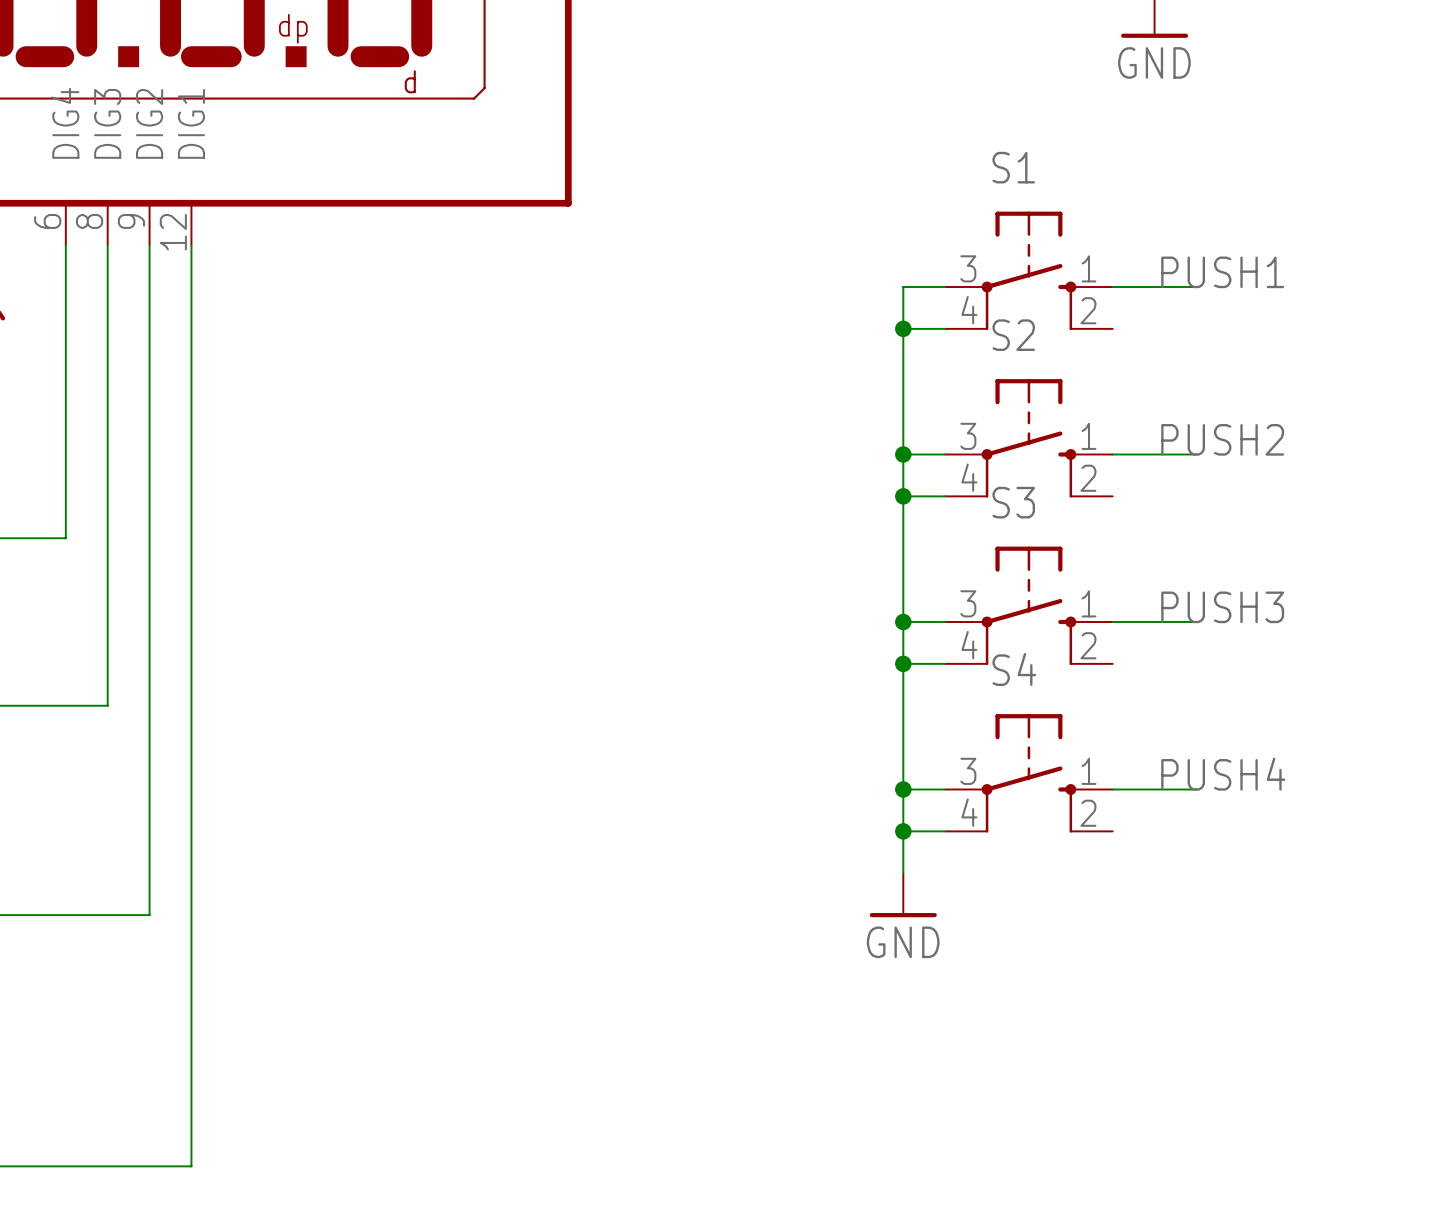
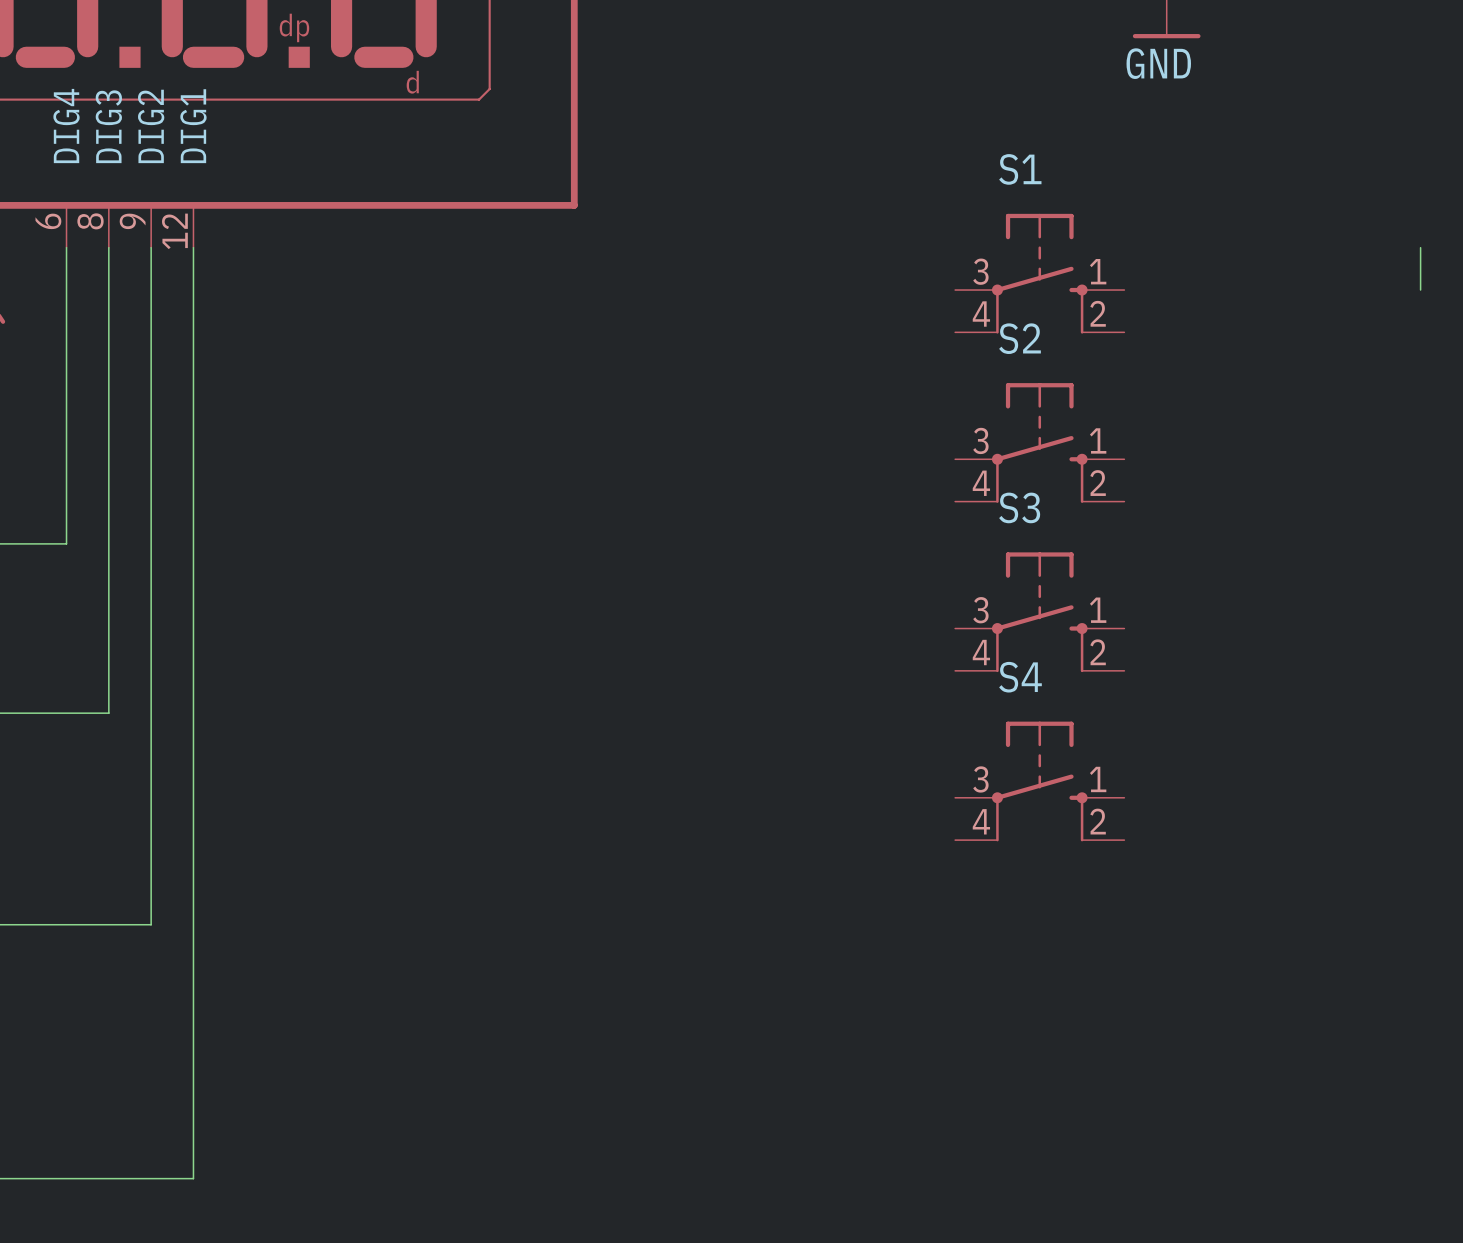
wire: none -> (1420, 247) (1420, 290)
label: PUSH1 (1222, 272) -> none
wire: (945, 287) (903, 287) (903, 873) -> none
wire: (1112, 287) (1196, 287) -> none
wire: (903, 328) (945, 328) -> none
junction: (903, 328) -> none
label: PUSH2 (1222, 439) -> none
wire: (903, 454) (945, 454) -> none
junction: (903, 454) -> none
wire: (1112, 454) (1196, 454) -> none
wire: (903, 496) (945, 496) -> none
junction: (903, 496) -> none
label: PUSH3 (1222, 607) -> none
wire: (903, 621) (945, 621) -> none
junction: (903, 621) -> none
wire: (1112, 621) (1196, 621) -> none
wire: (903, 663) (945, 663) -> none
junction: (903, 663) -> none
label: PUSH4 (1223, 774) -> none
wire: (903, 789) (945, 789) -> none
junction: (903, 789) -> none
wire: (1112, 789) (1196, 789) -> none
wire: (903, 831) (945, 831) -> none
junction: (903, 831) -> none
power symbol: GND (903, 895) -> none

